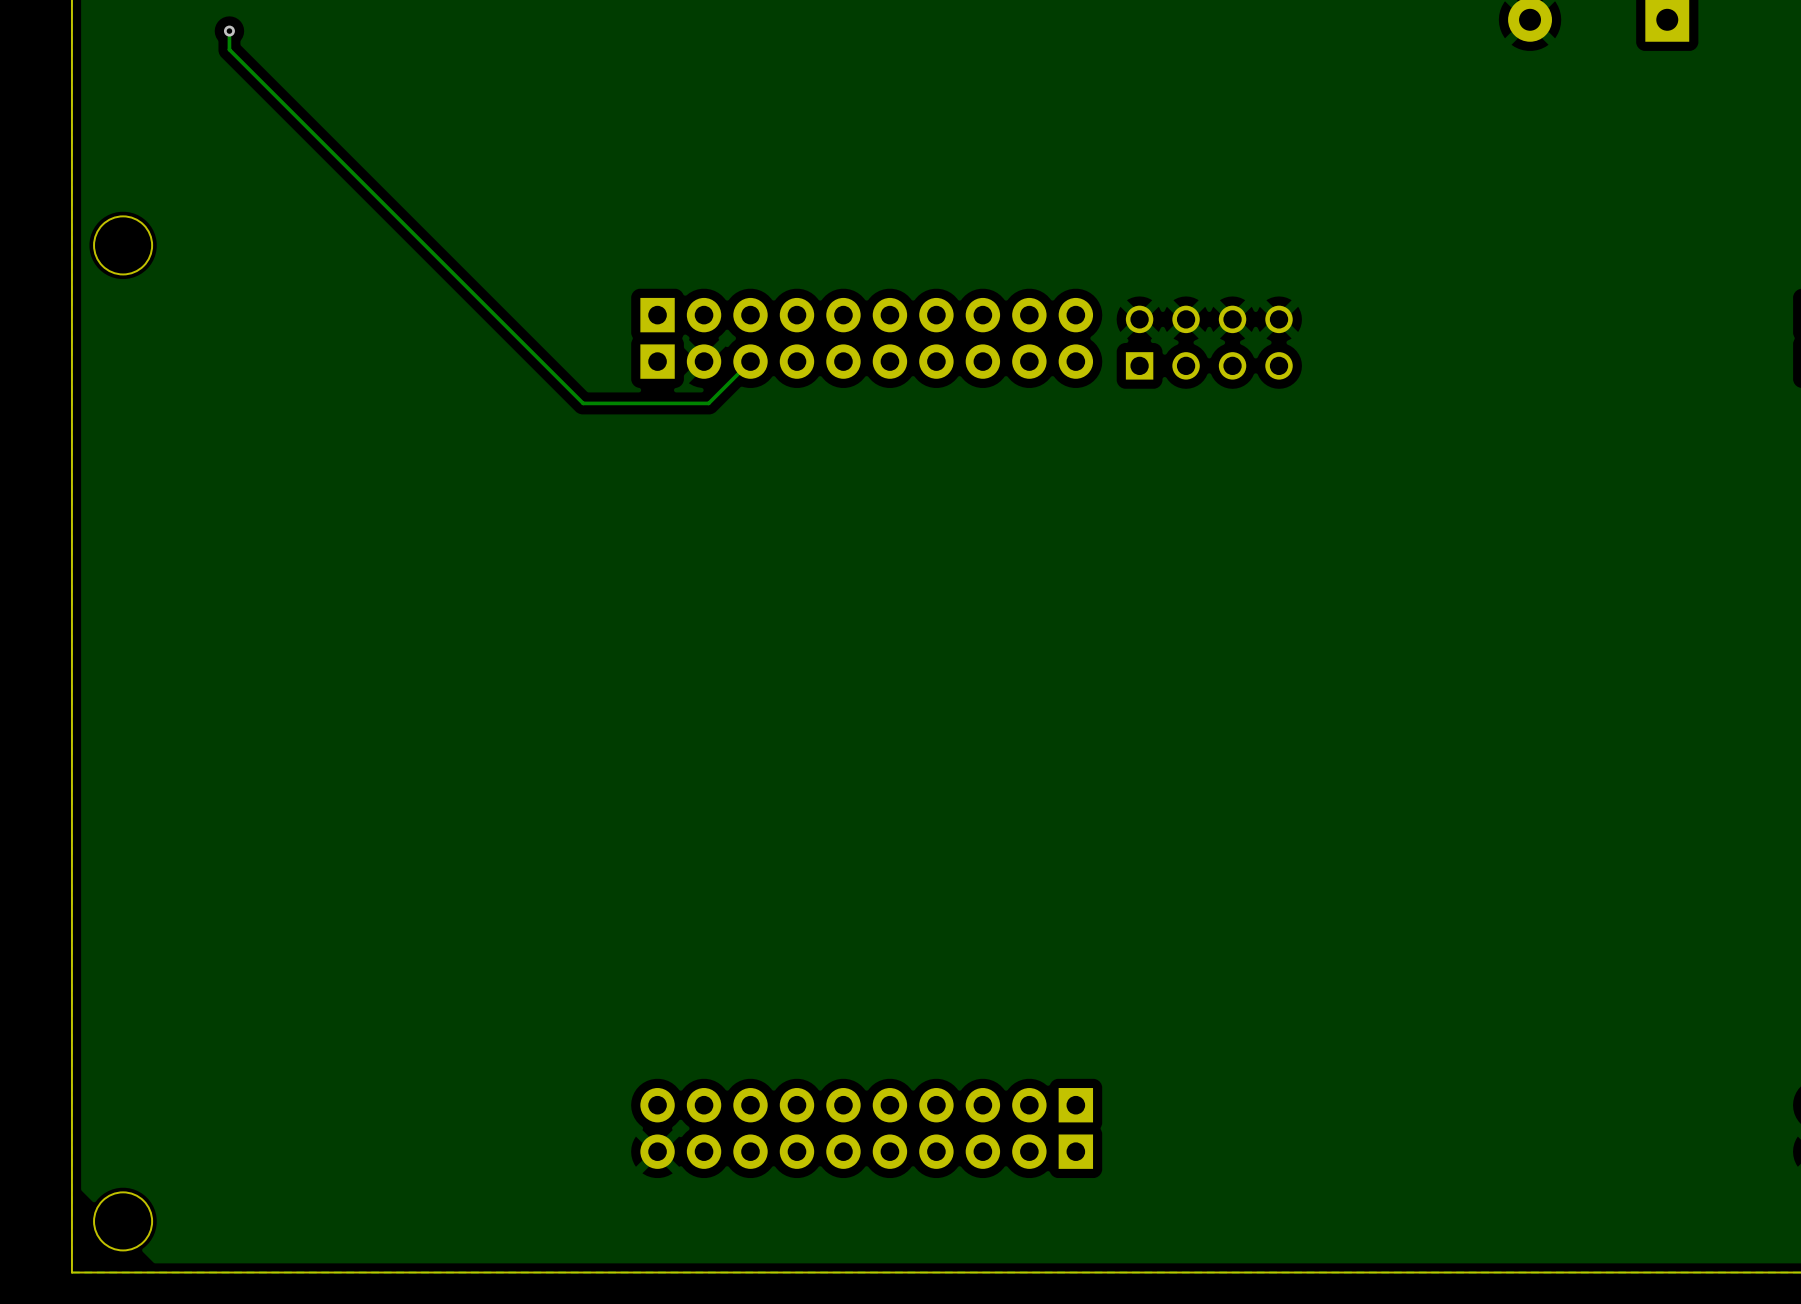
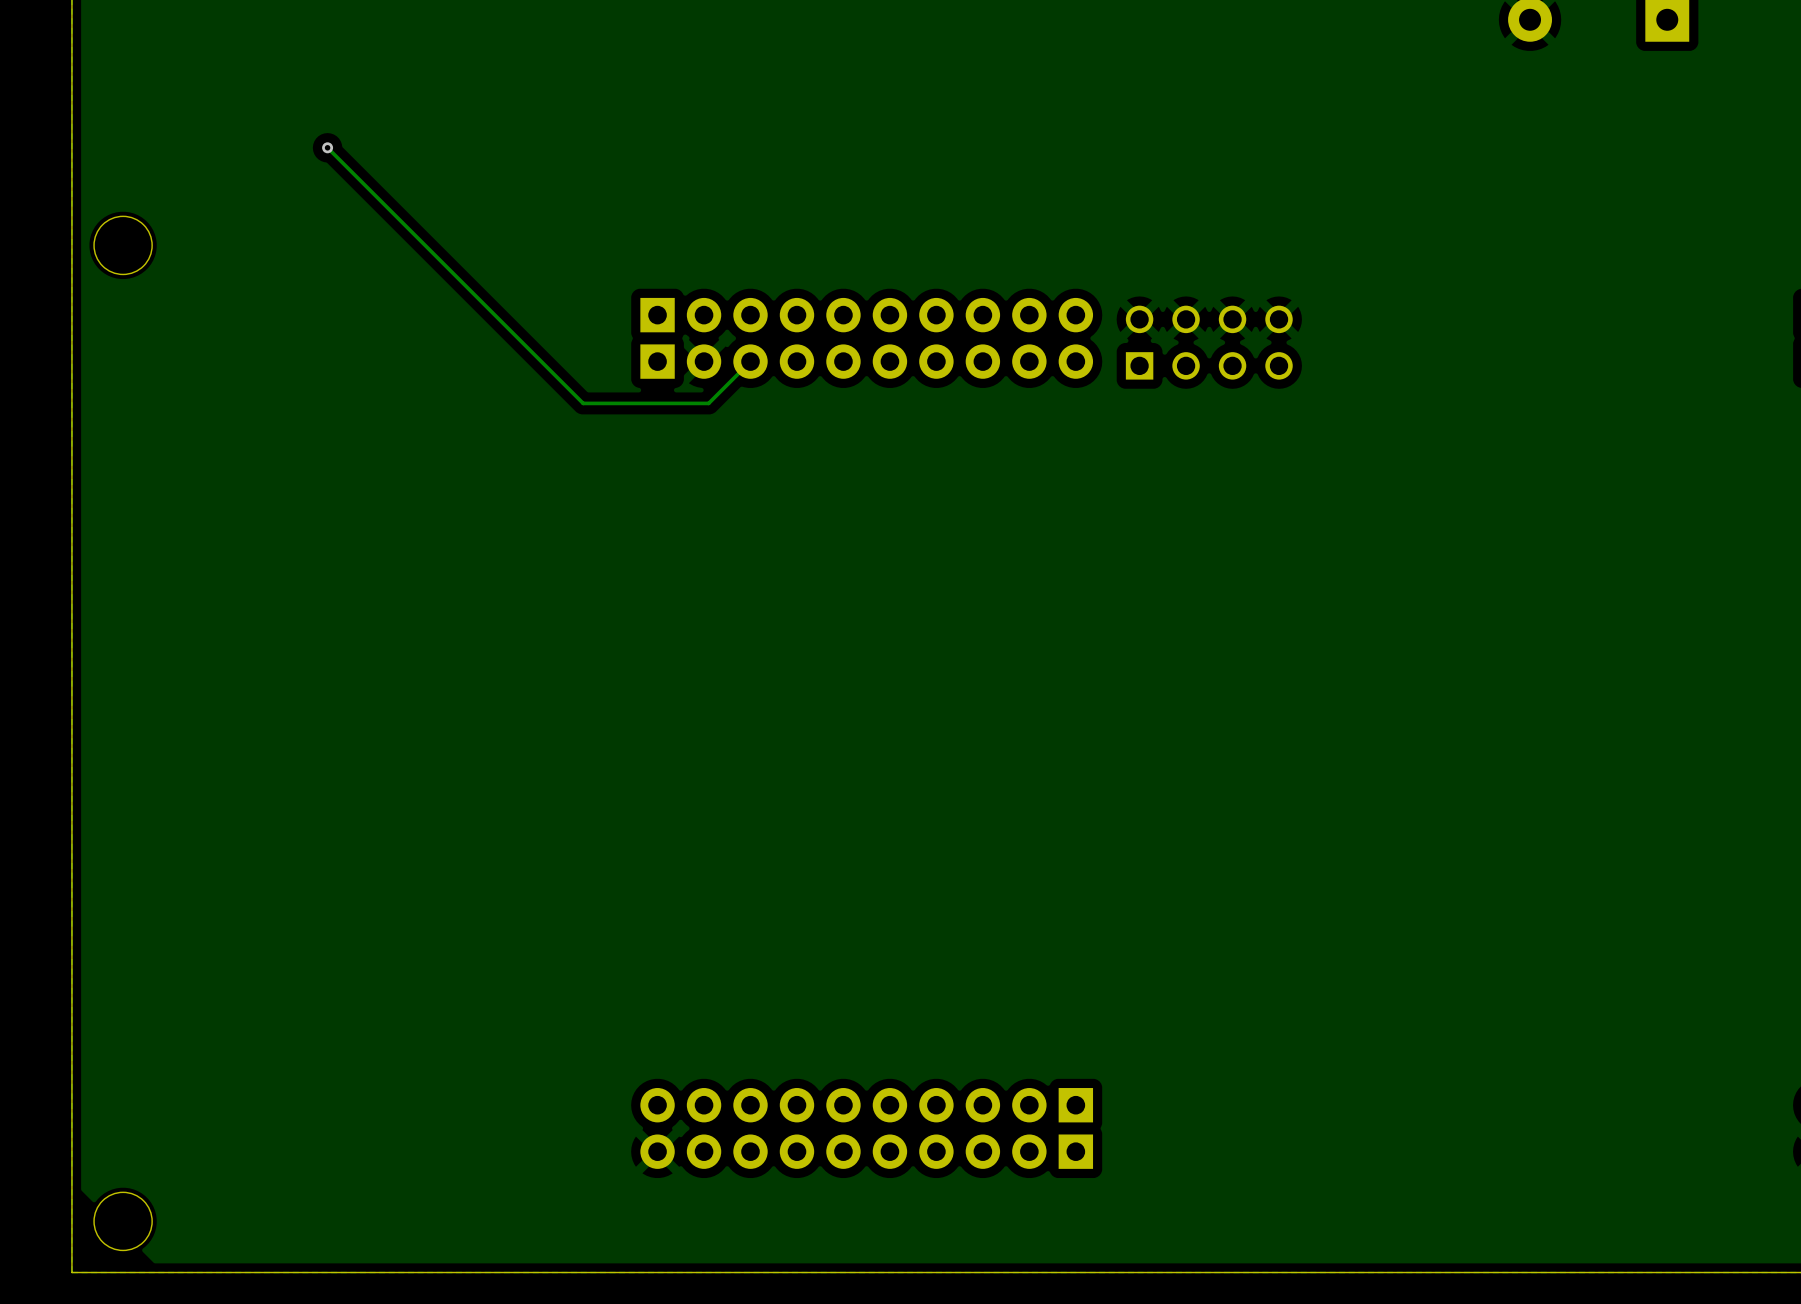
track: (229, 31) (229, 49) (327, 147) -> none
via: (229, 31) -> none
via: none -> (327, 147)

